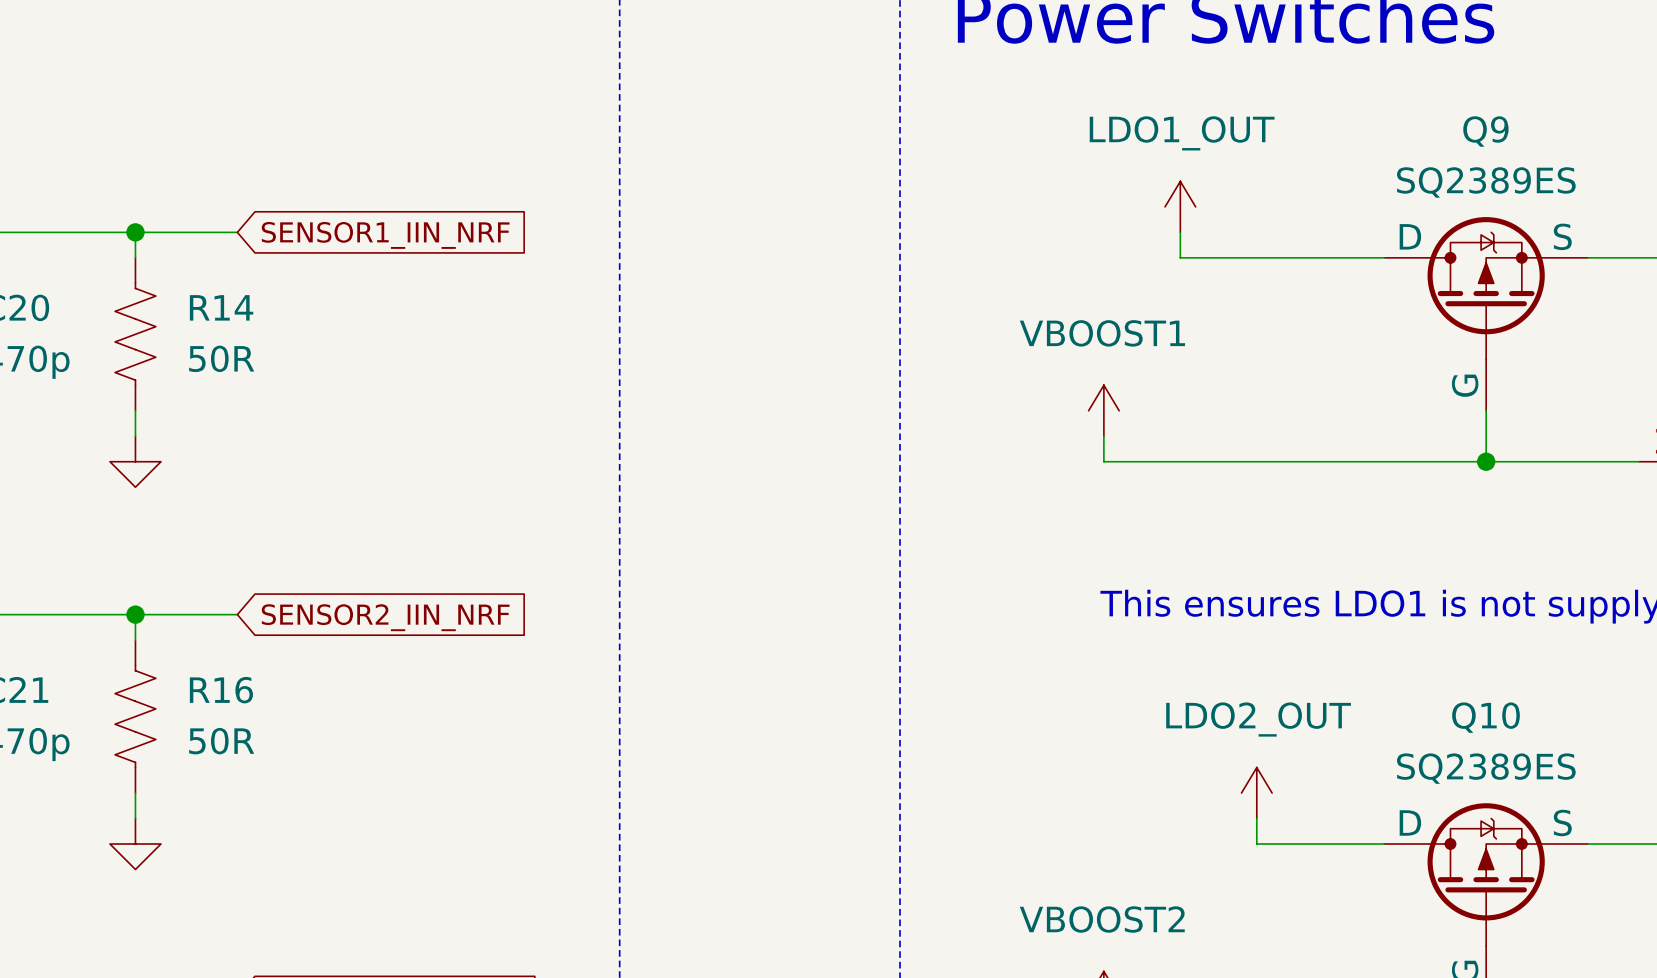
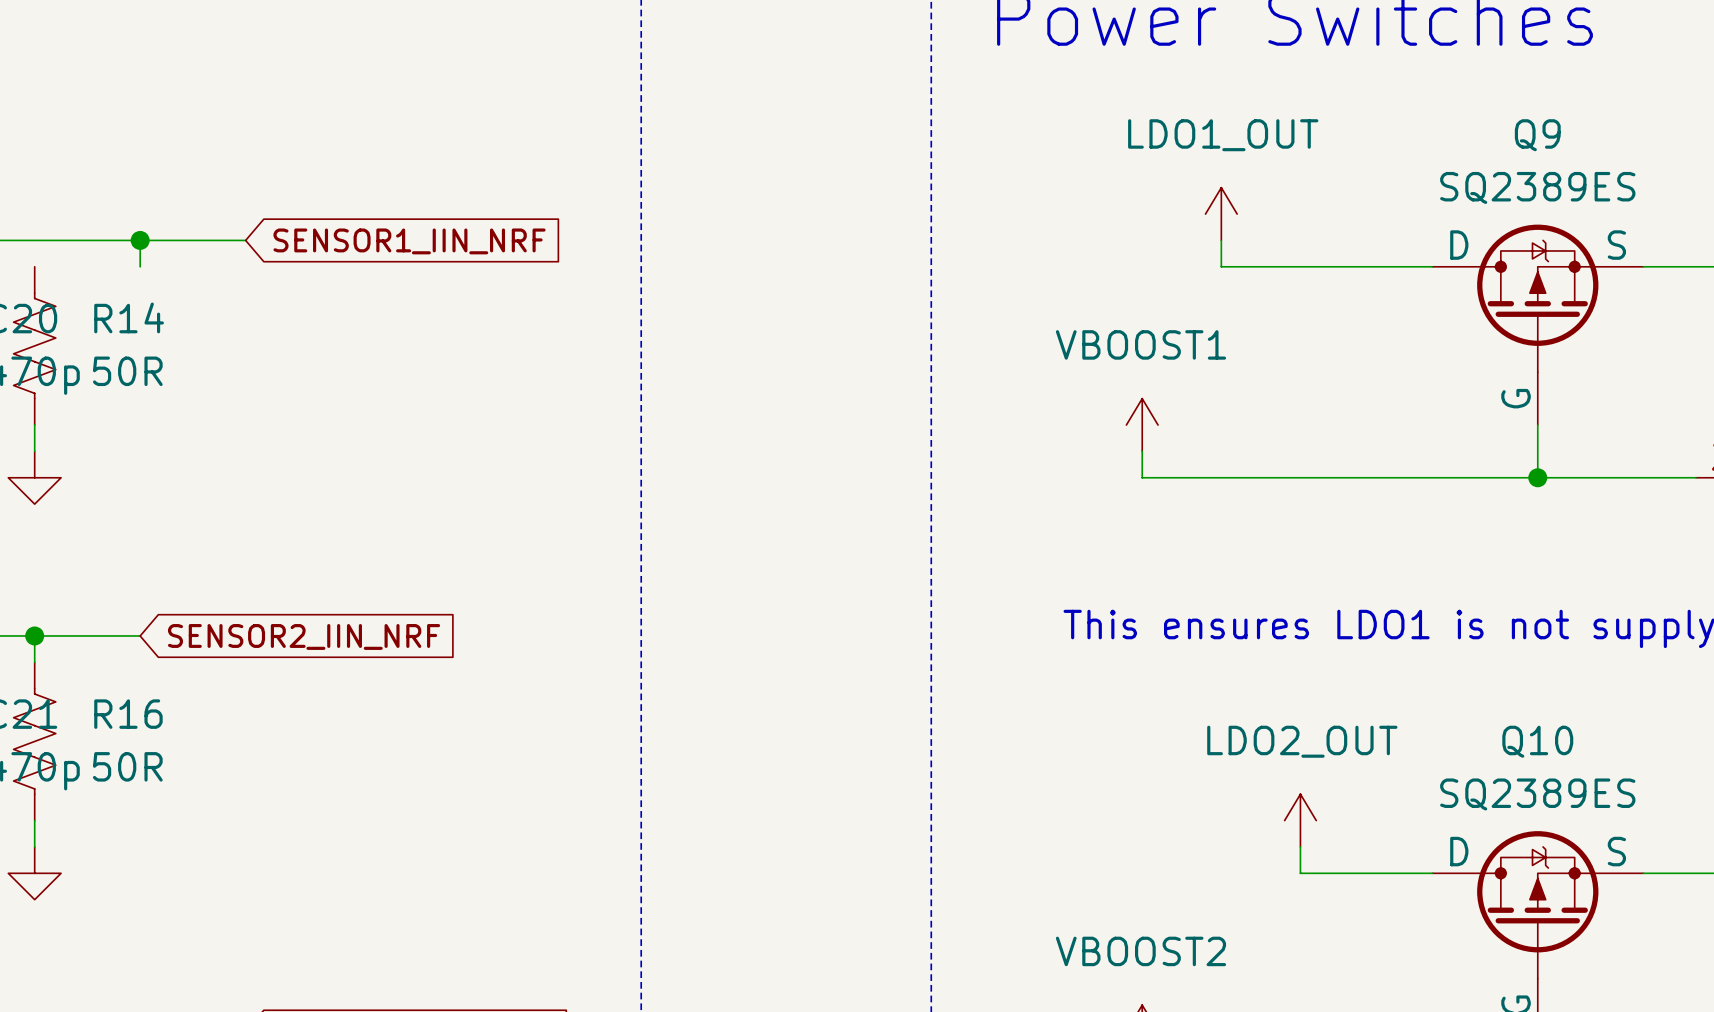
R14 position: (135, 334) -> (34, 345)
wire: (135, 410) (135, 436) -> (34, 425) (34, 451)
power symbol position: (135, 461) -> (34, 477)
wire: none -> (34, 635) (34, 662)
junction: none -> (34, 635)
junction: (135, 614) -> none
wire: (237, 614) (135, 614) (135, 640) -> none
global label position: SENSOR2_IIN_NRF (385, 617) -> SENSOR2_IIN_NRF (304, 636)
R16 position: (135, 716) -> (34, 741)
wire: (135, 793) (135, 818) -> (34, 820) (34, 846)
power symbol position: (135, 844) -> (34, 873)

